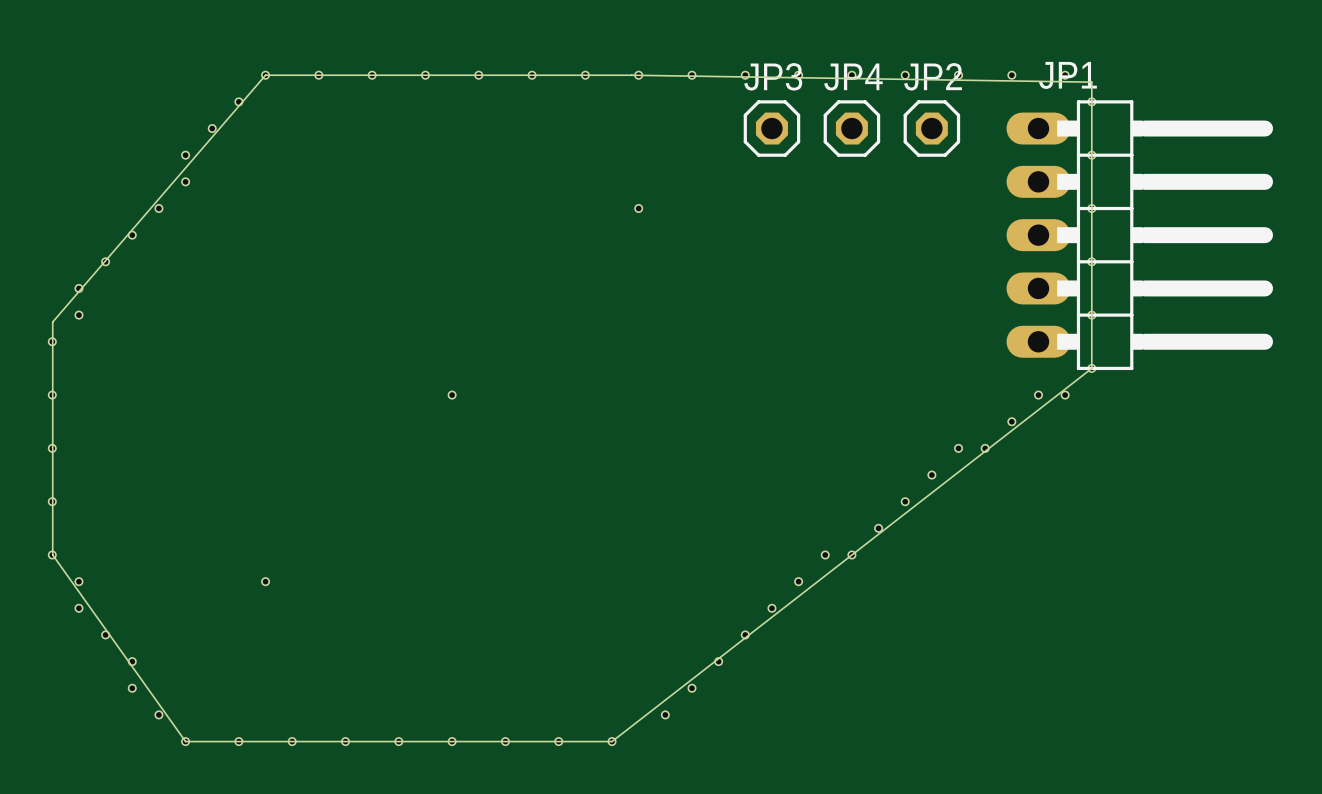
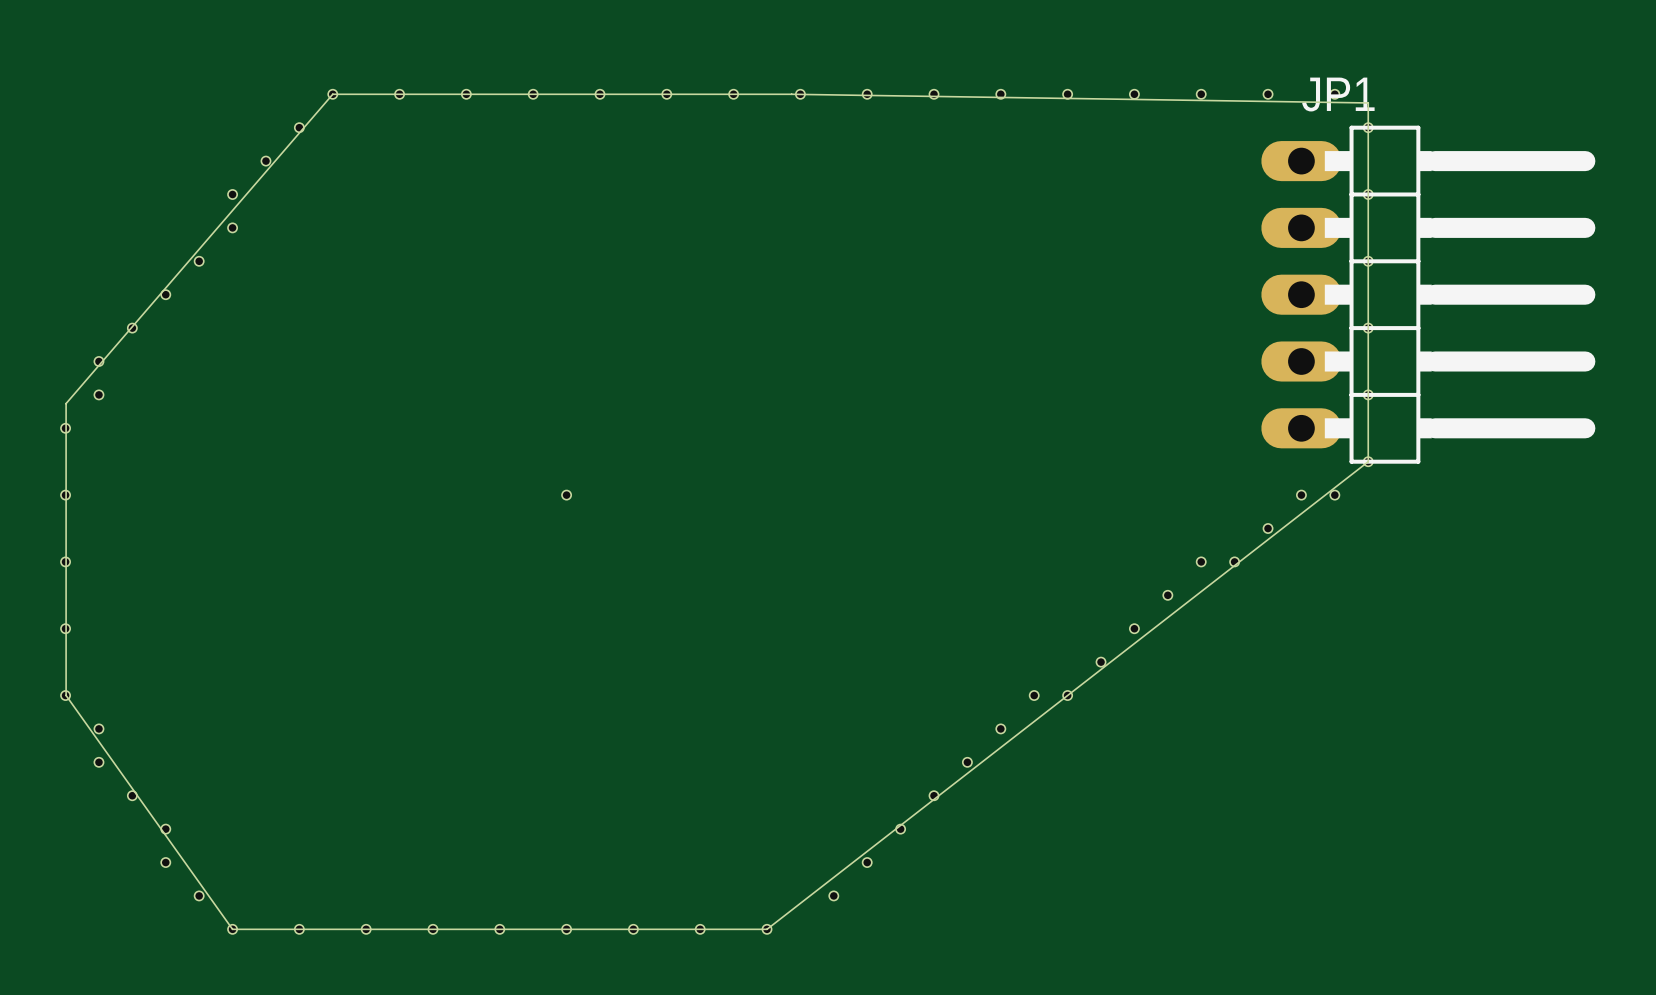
JP3: (771, 128) -> none
JP4: (851, 128) -> none
JP2: (931, 128) -> none
hole: (638, 208) -> none
hole: (265, 581) -> none

